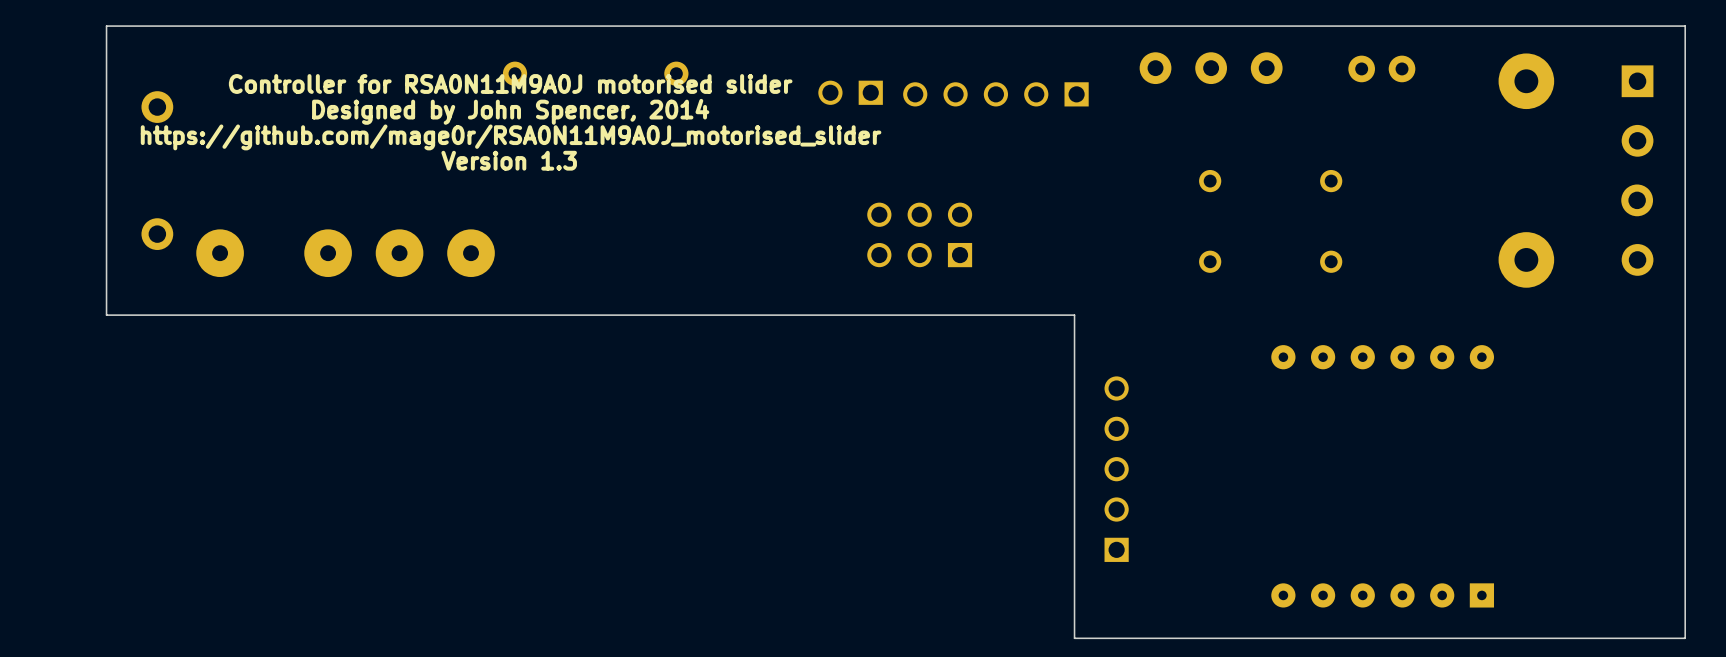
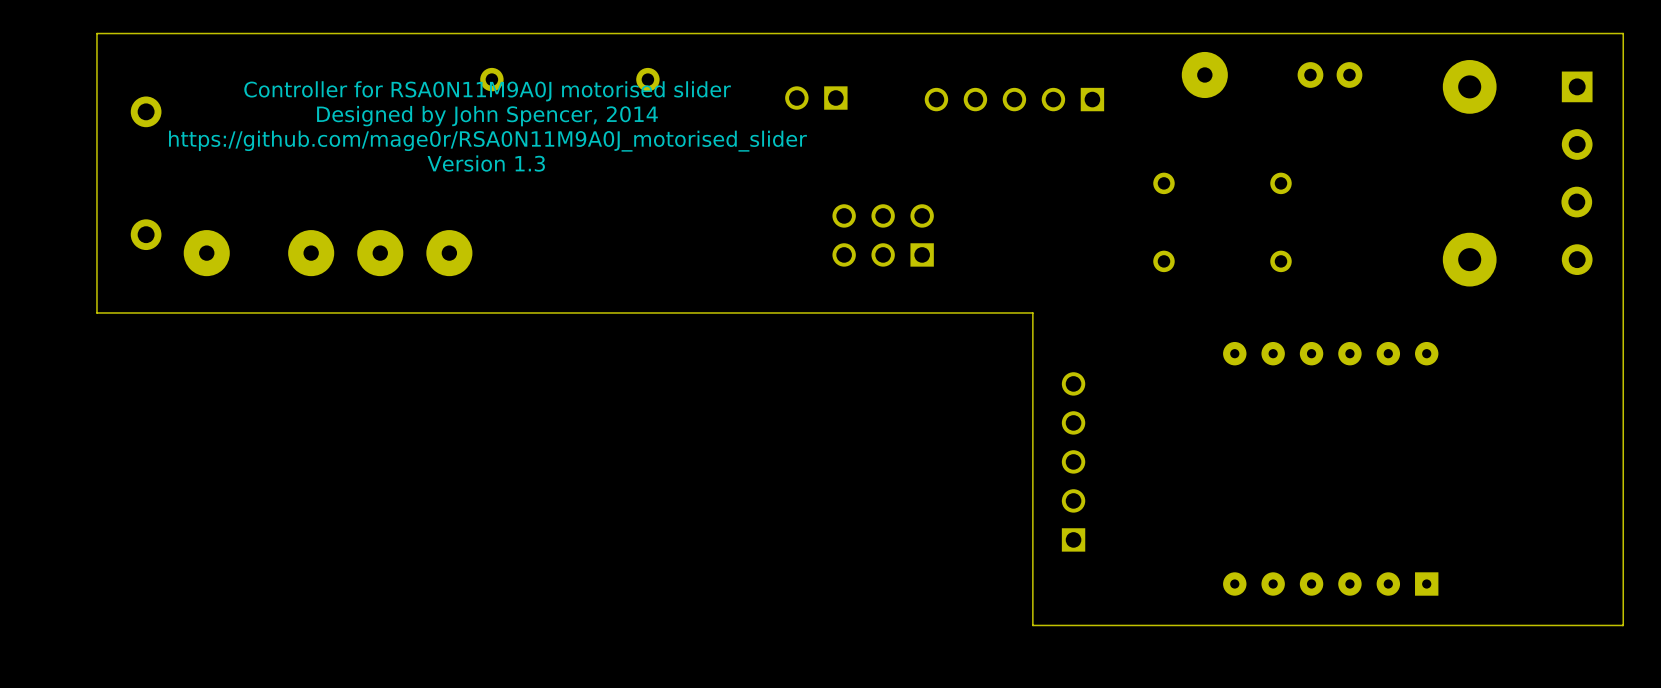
part footprint: [1250, 52, 1283, 85] -> [1181, 51, 1228, 99]
part: (1155, 68) -> none
part: (1211, 68) -> none
part position: (995, 94) -> (1014, 99)

